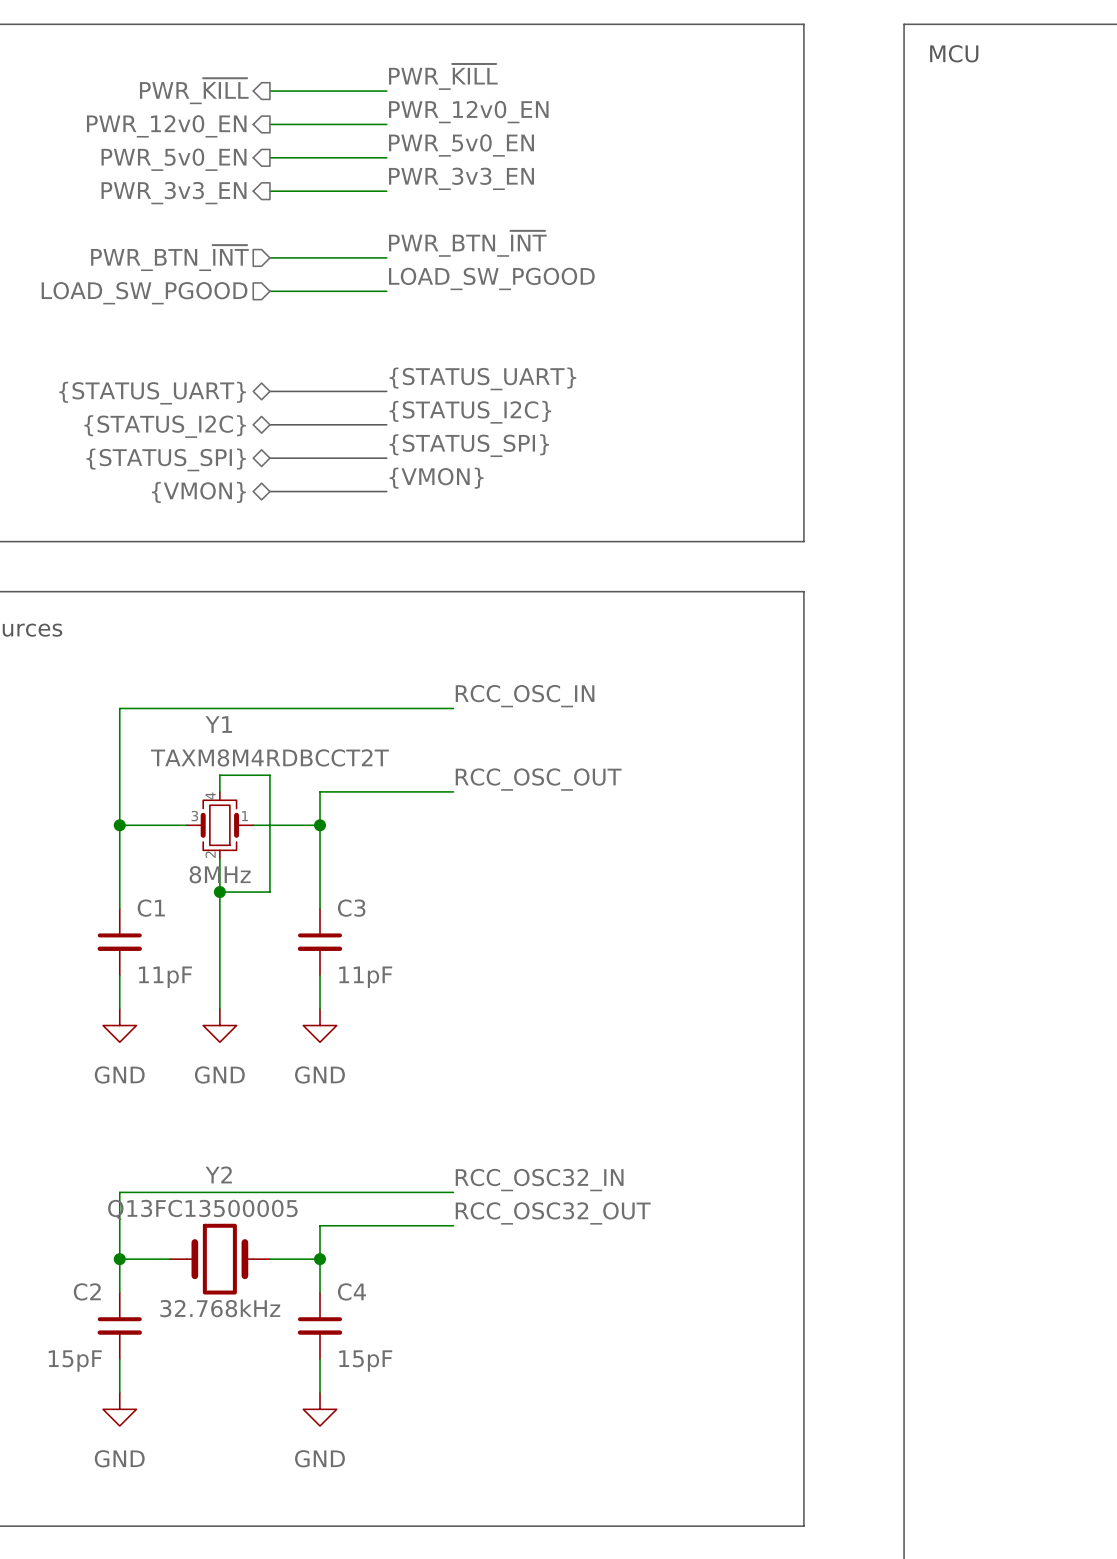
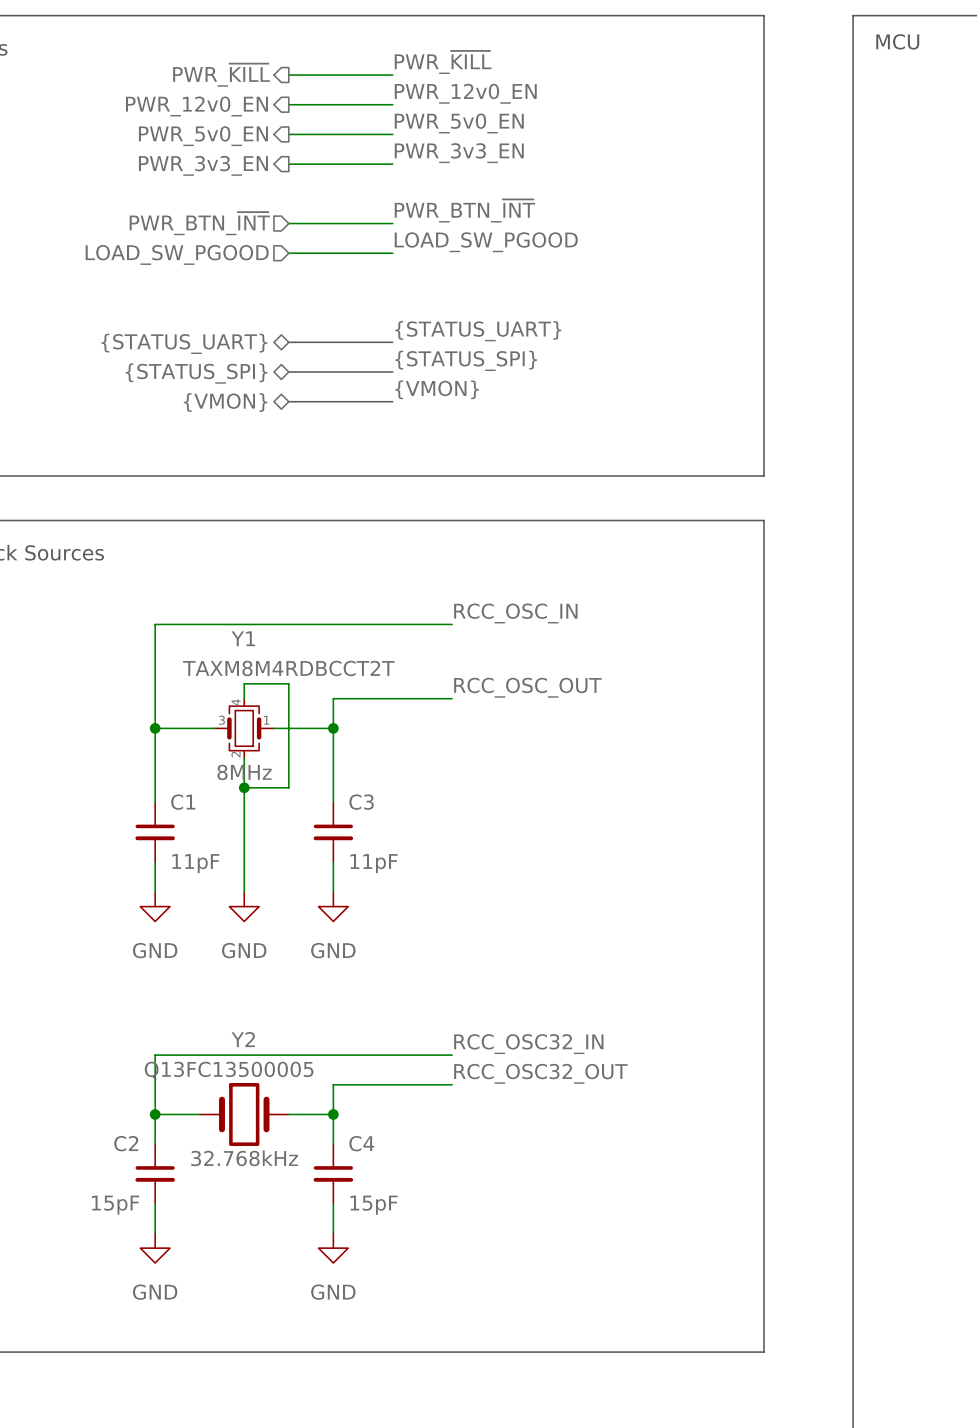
label: {STATUS_I2C} (470, 412) -> {STATUS_SPI} (466, 360)
hierarchical label: {STATUS_I2C} (165, 426) -> {STATUS_SPI} (196, 373)
label: {STATUS_SPI} (469, 445) -> {VMON} (437, 389)
hierarchical label: {STATUS_SPI} (166, 459) -> {VMON} (225, 402)
label: {VMON} (436, 478) -> none
bus: (269, 491) (386, 491) -> none
hierarchical label: {VMON} (198, 492) -> none

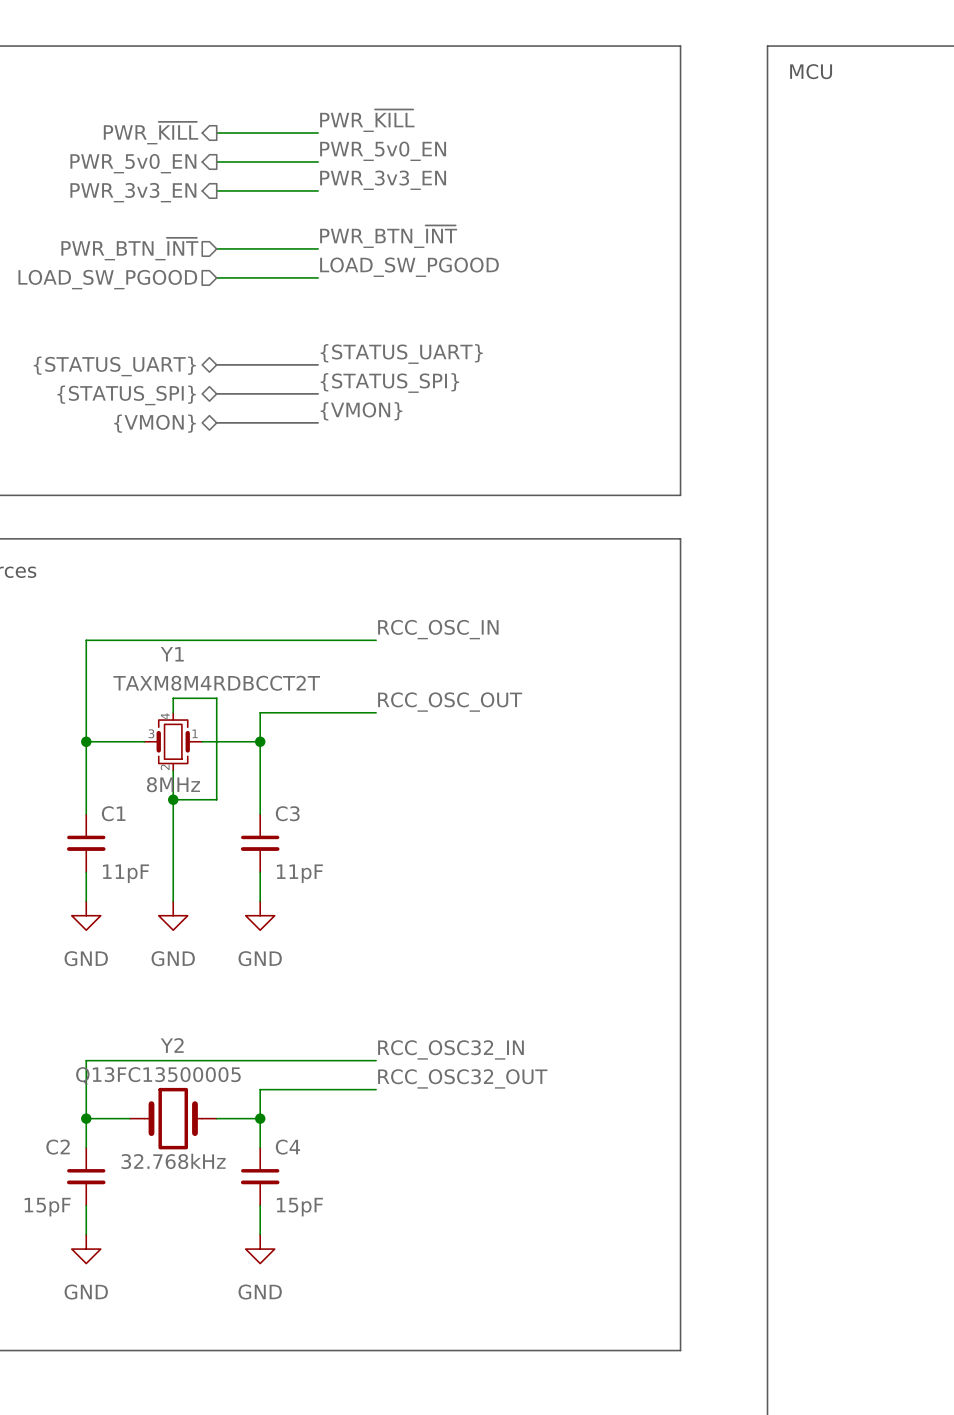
label: PWR_~{KILL} (443, 62) -> none
hierarchical label: PWR_~{KILL} (221, 75) -> none
wire: (288, 75) (392, 75) -> none
label: PWR_12v0_EN (465, 93) -> PWR_~{KILL} (367, 120)
hierarchical label: PWR_12v0_EN (196, 106) -> PWR_~{KILL} (151, 133)

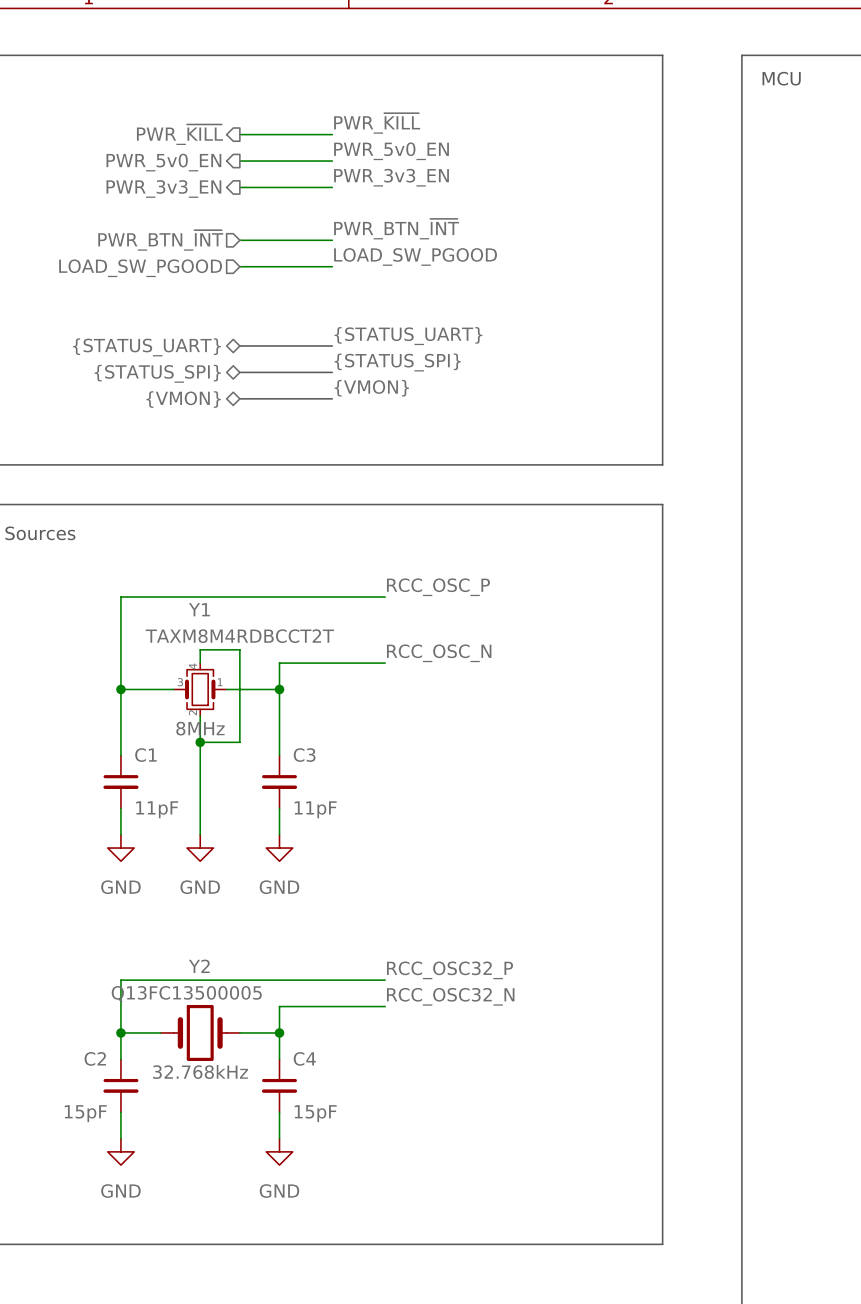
label: RCC_OSC_IN (438, 629) -> RCC_OSC_P (438, 587)
label: RCC_OSC_OUT (450, 702) -> RCC_OSC_N (439, 653)
label: RCC_OSC32_IN (450, 1049) -> RCC_OSC32_P (449, 970)
label: RCC_OSC32_OUT (462, 1078) -> RCC_OSC32_N (450, 996)

